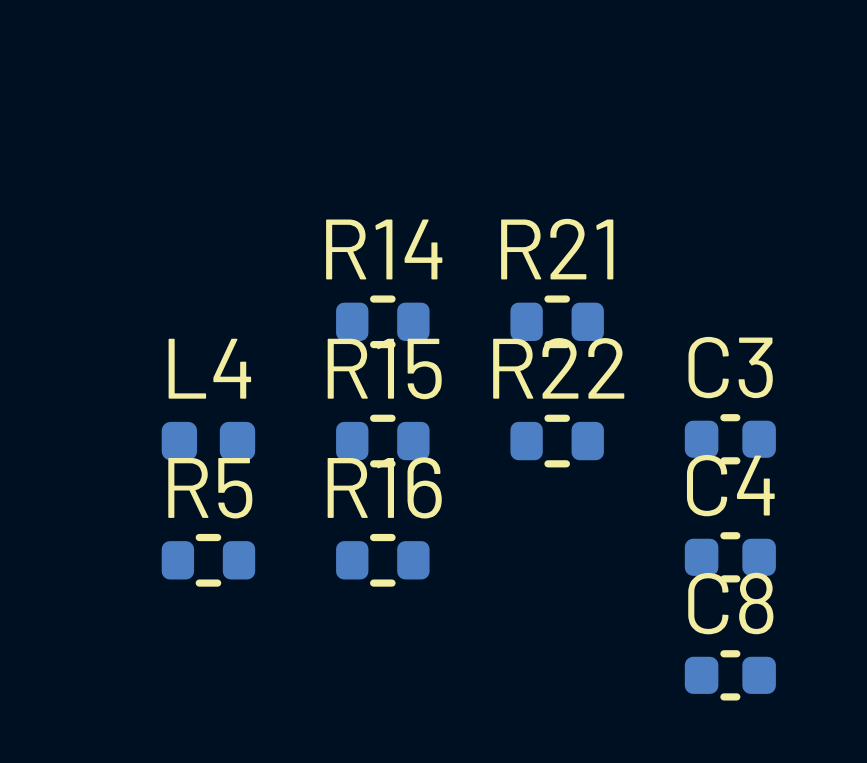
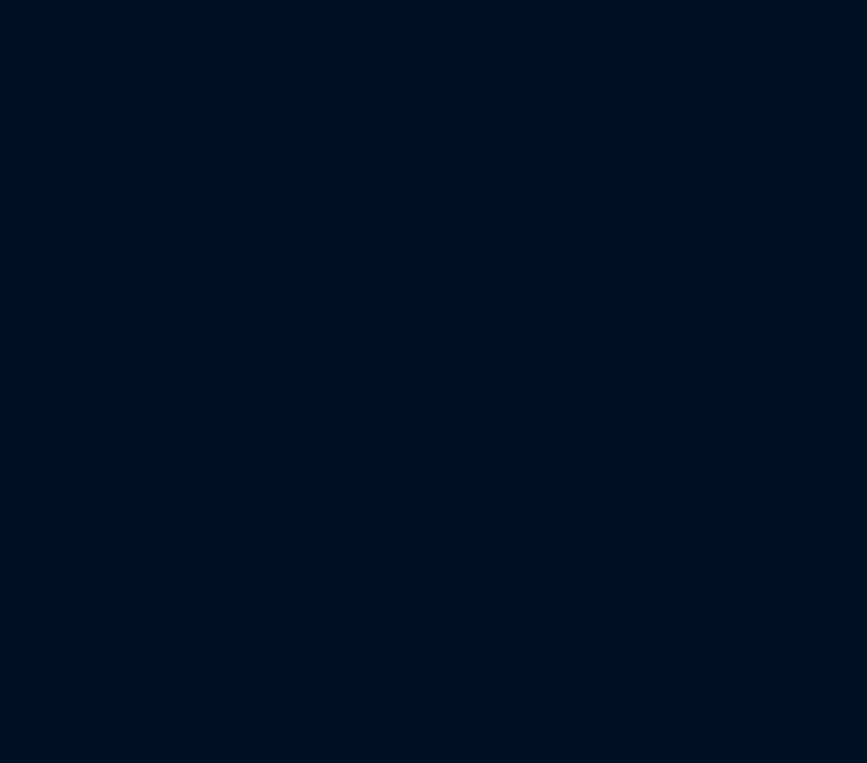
R14: (382, 321) -> none
R21: (557, 321) -> none
C3: (730, 439) -> none
L4: (208, 441) -> none
R15: (382, 441) -> none
R22: (557, 441) -> none
C4: (730, 557) -> none
R5: (208, 560) -> none
R16: (382, 560) -> none
C8: (730, 675) -> none

